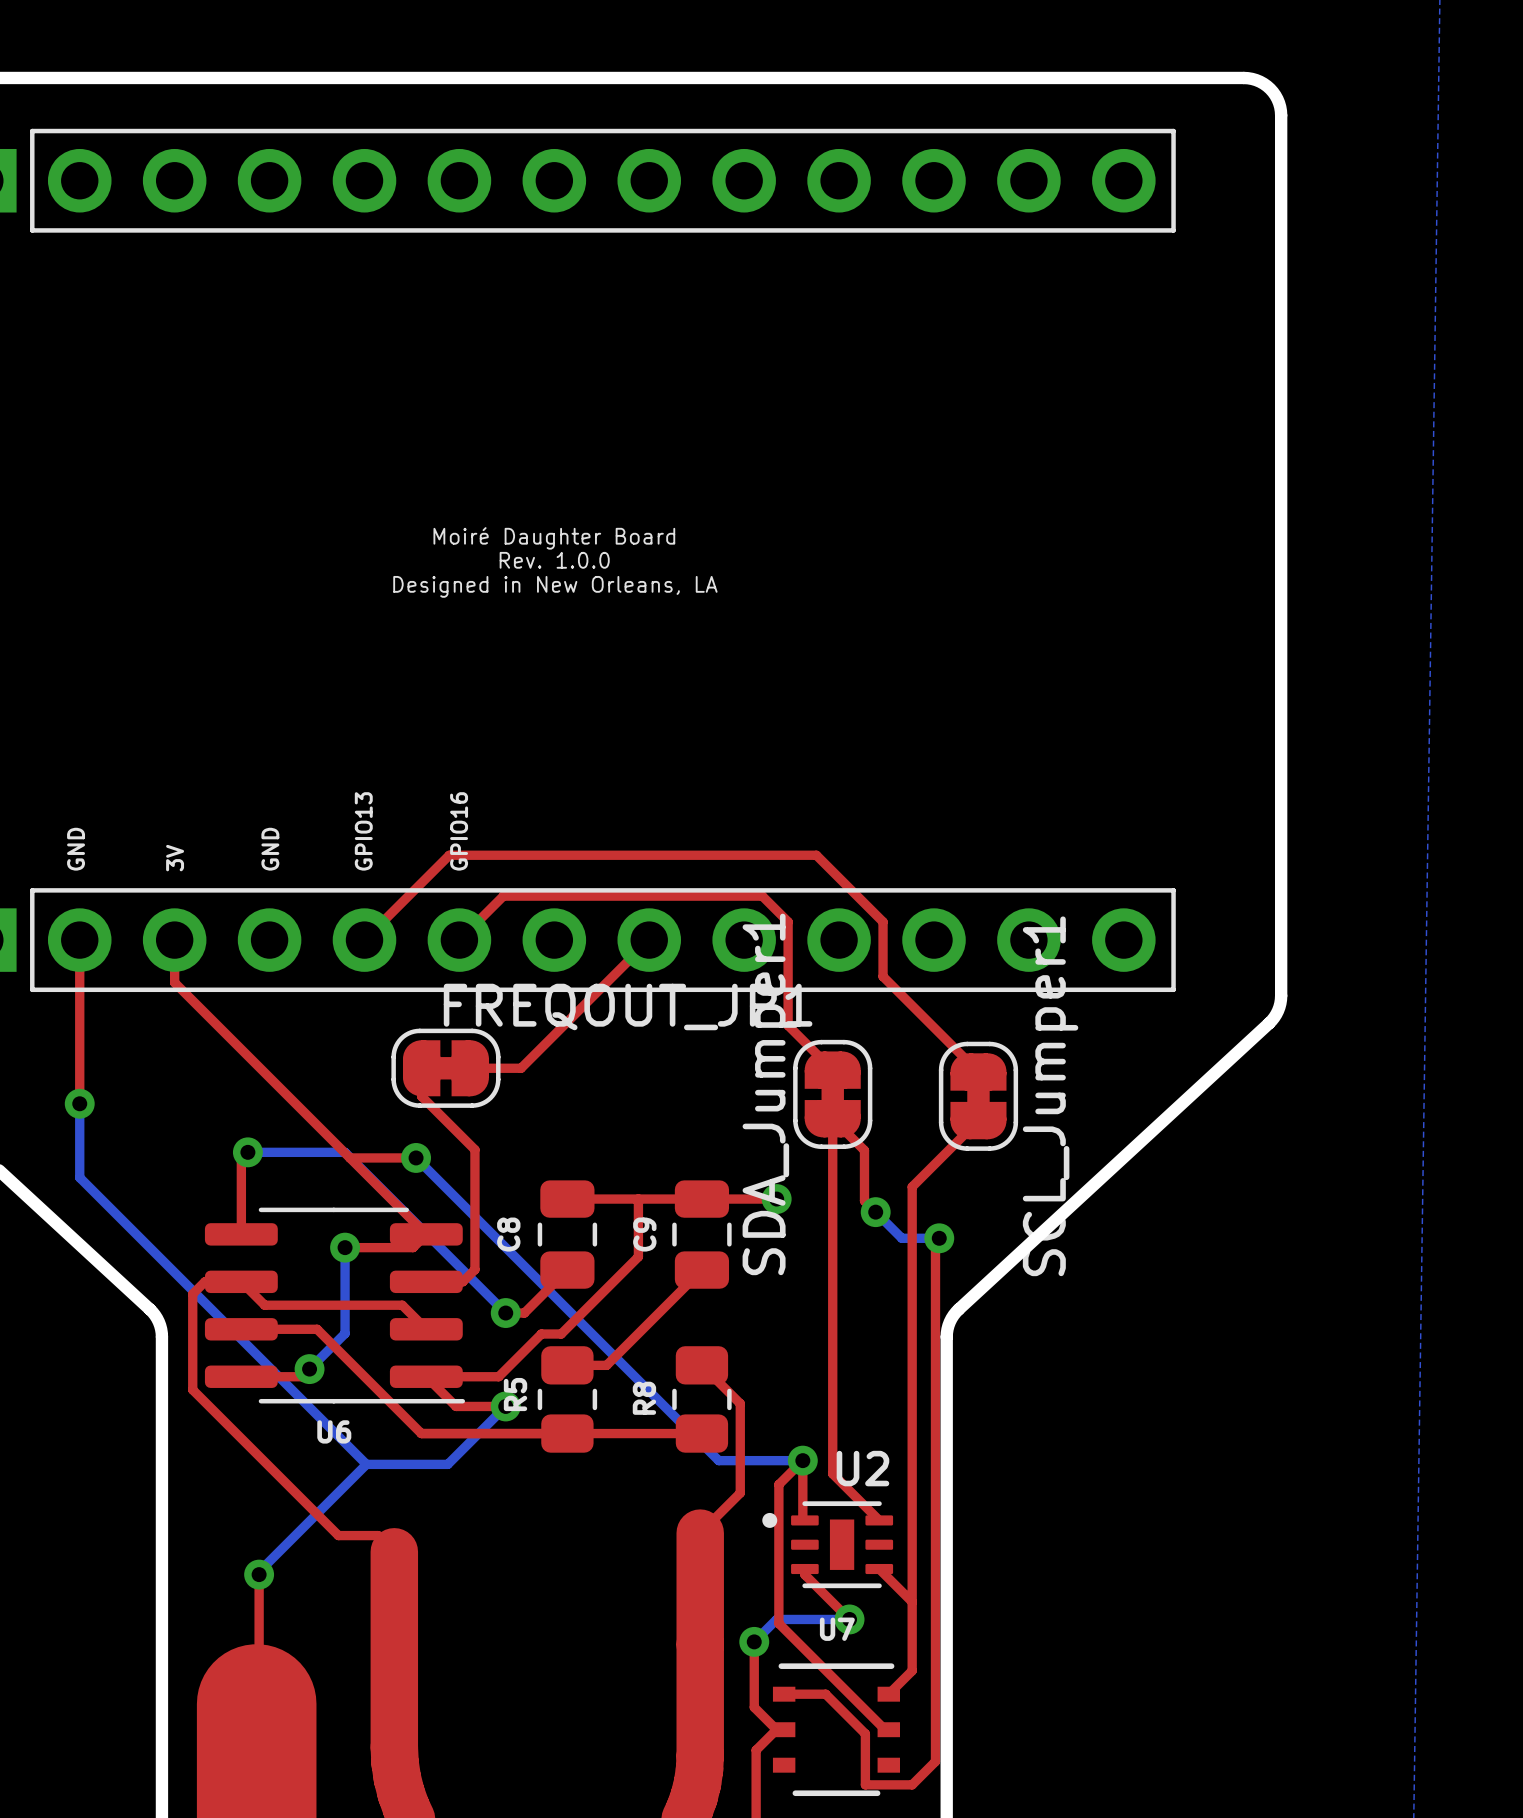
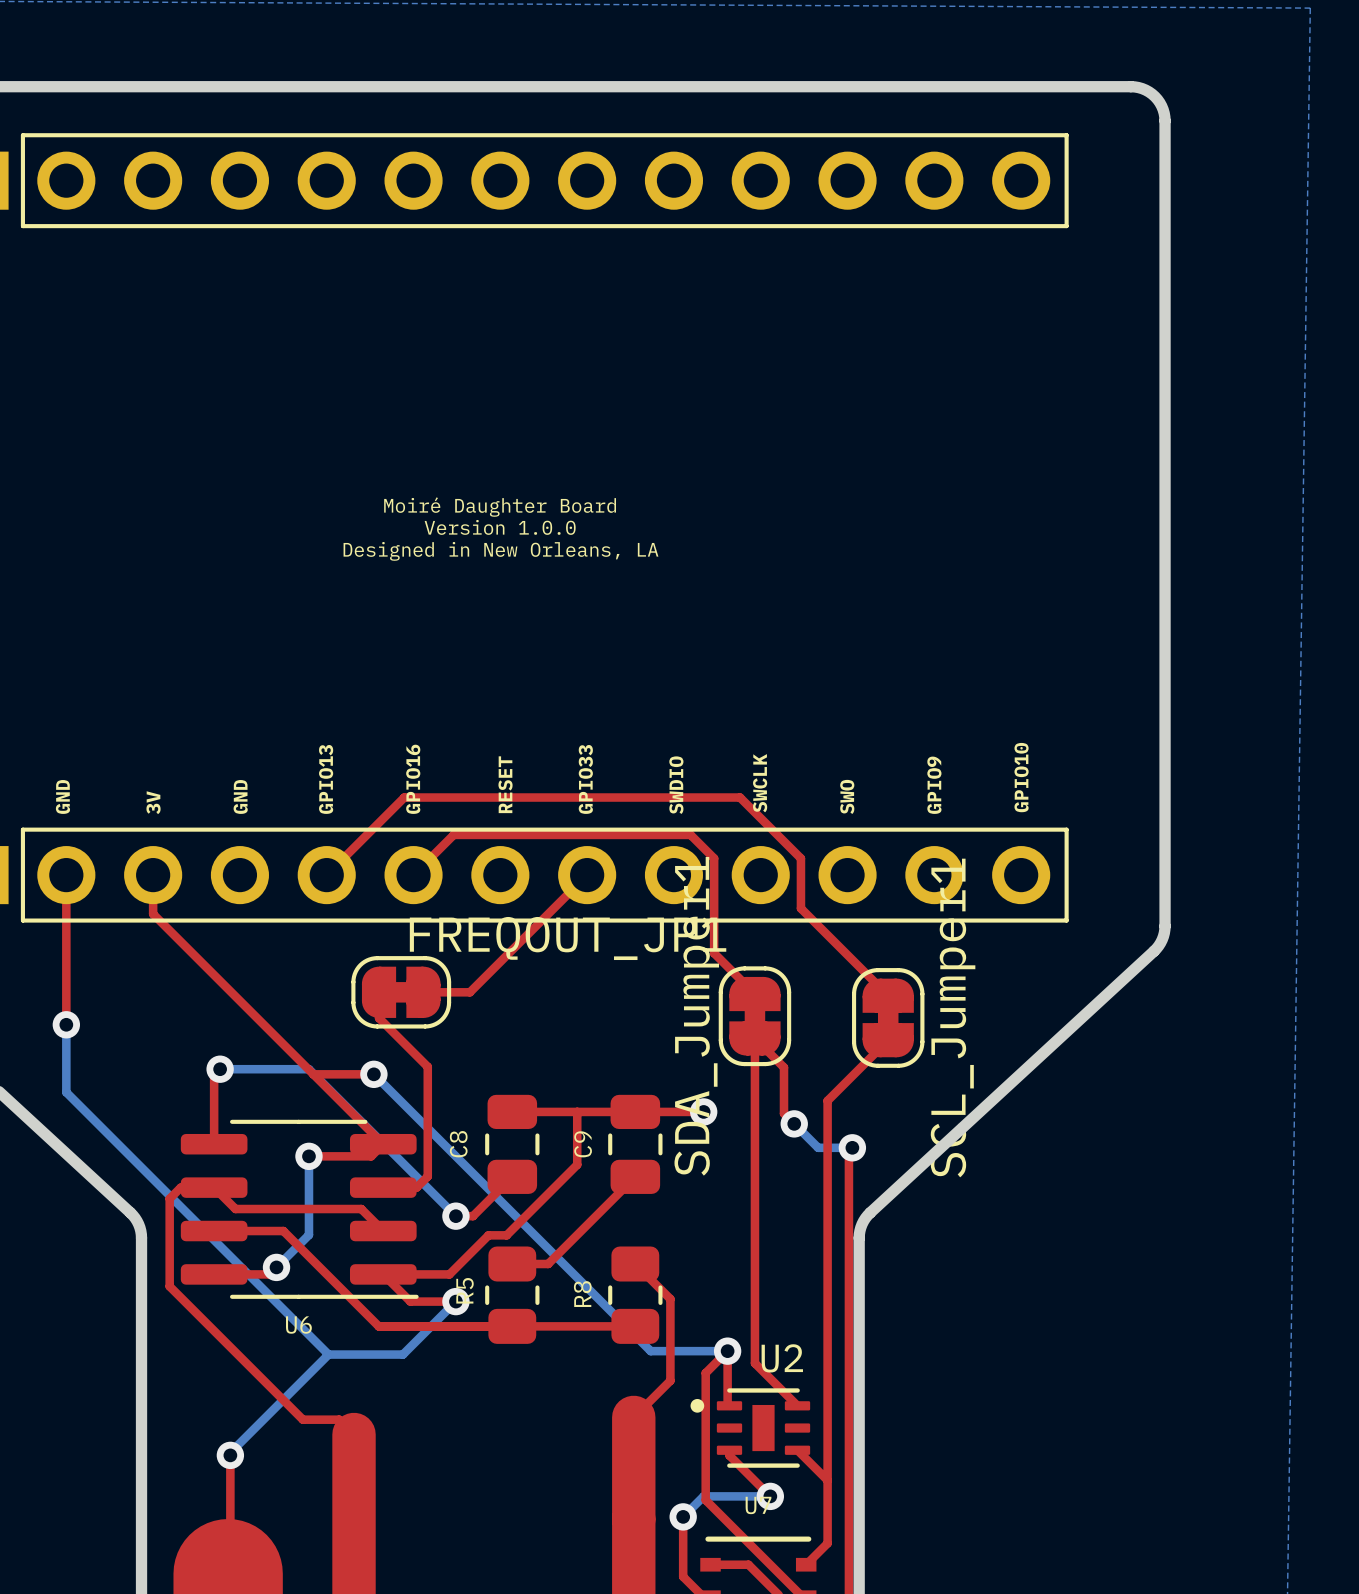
text: Rev. 1.0.0 (554, 560) -> Version 1.0.0 (500, 527)
text: none -> GPIO10 (1021, 777)
text: none -> GPIO33 (585, 779)
text: none -> SWCLK (760, 783)
text: none -> RESET (505, 784)
text: none -> SWDIO (676, 785)
text: none -> GPIO9 (934, 785)
text: none -> SWO (847, 796)

